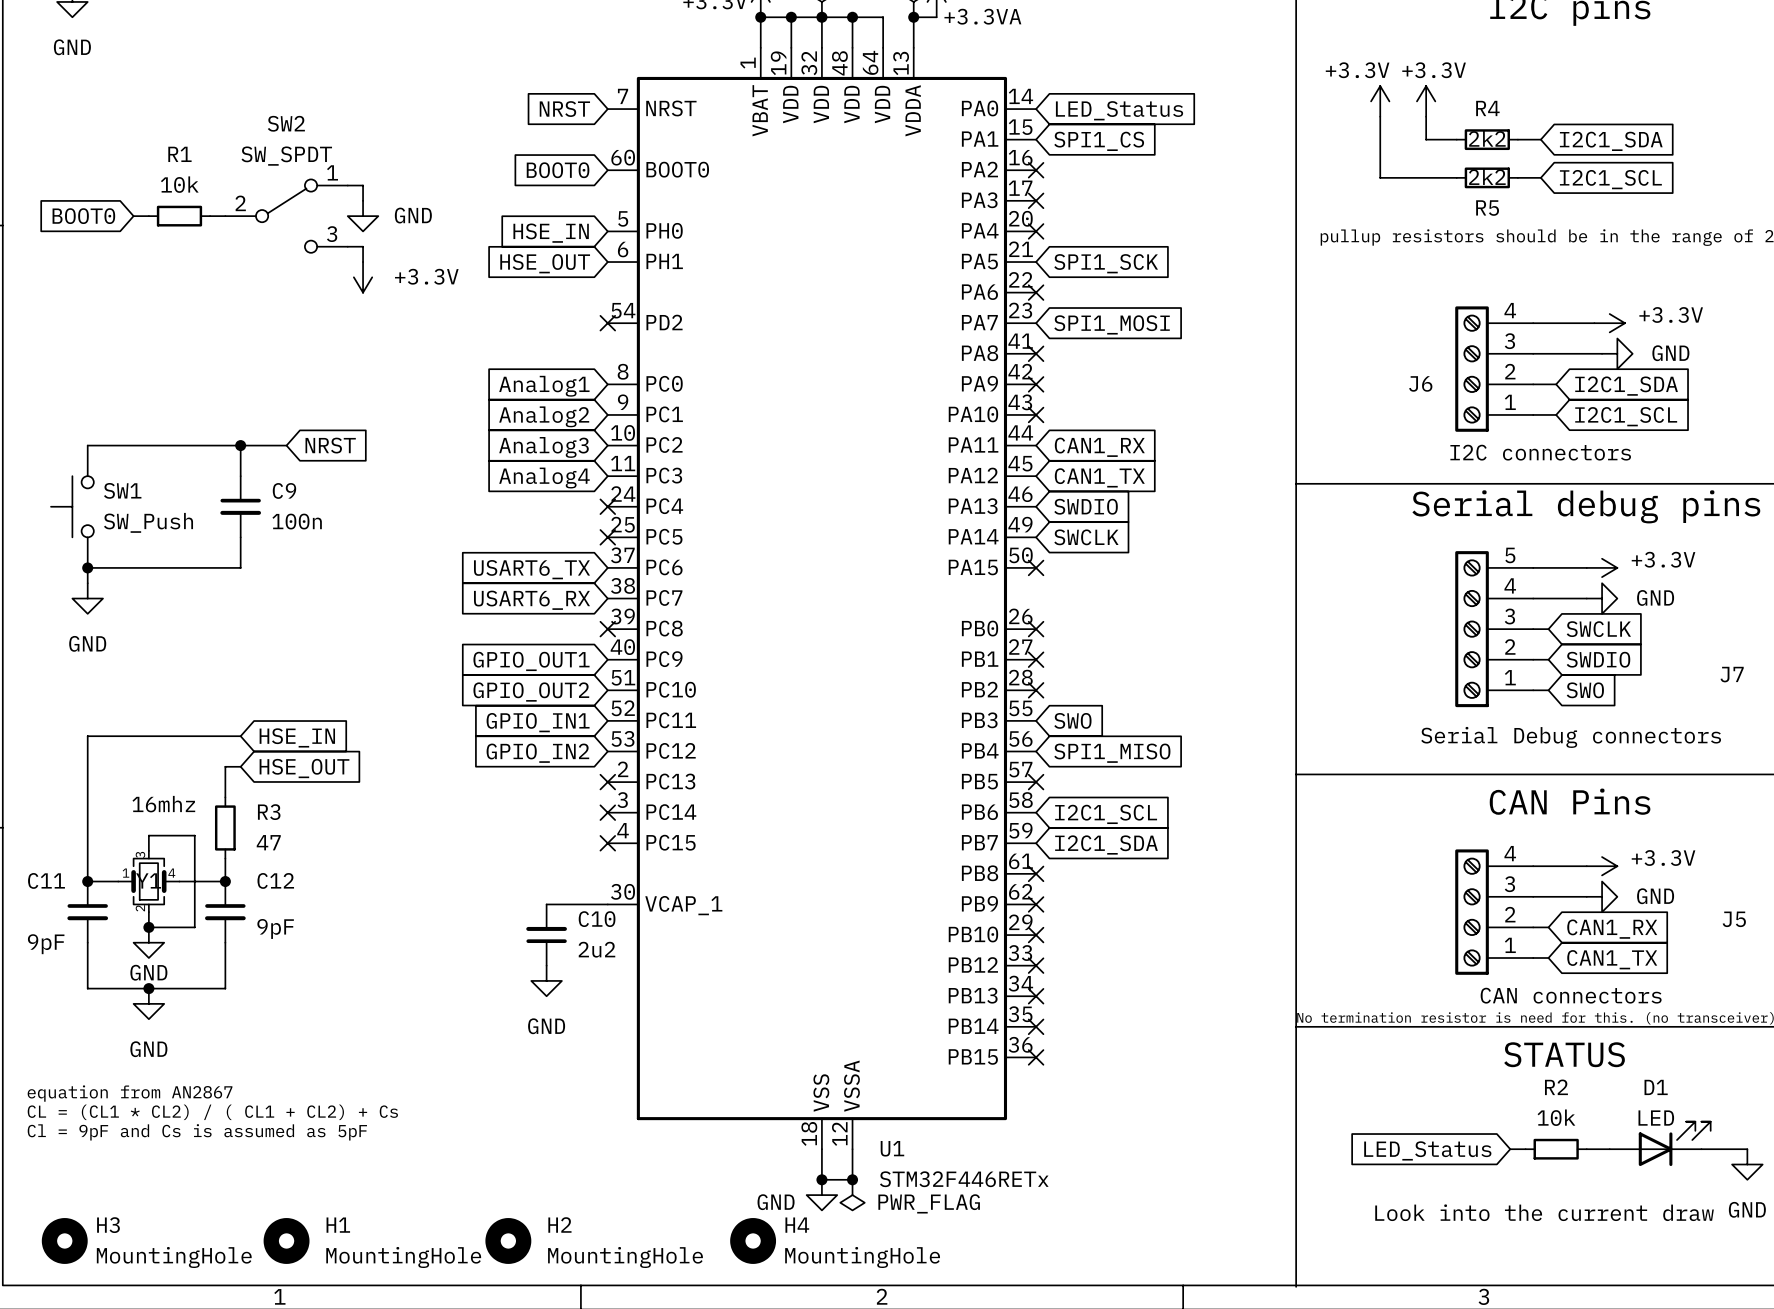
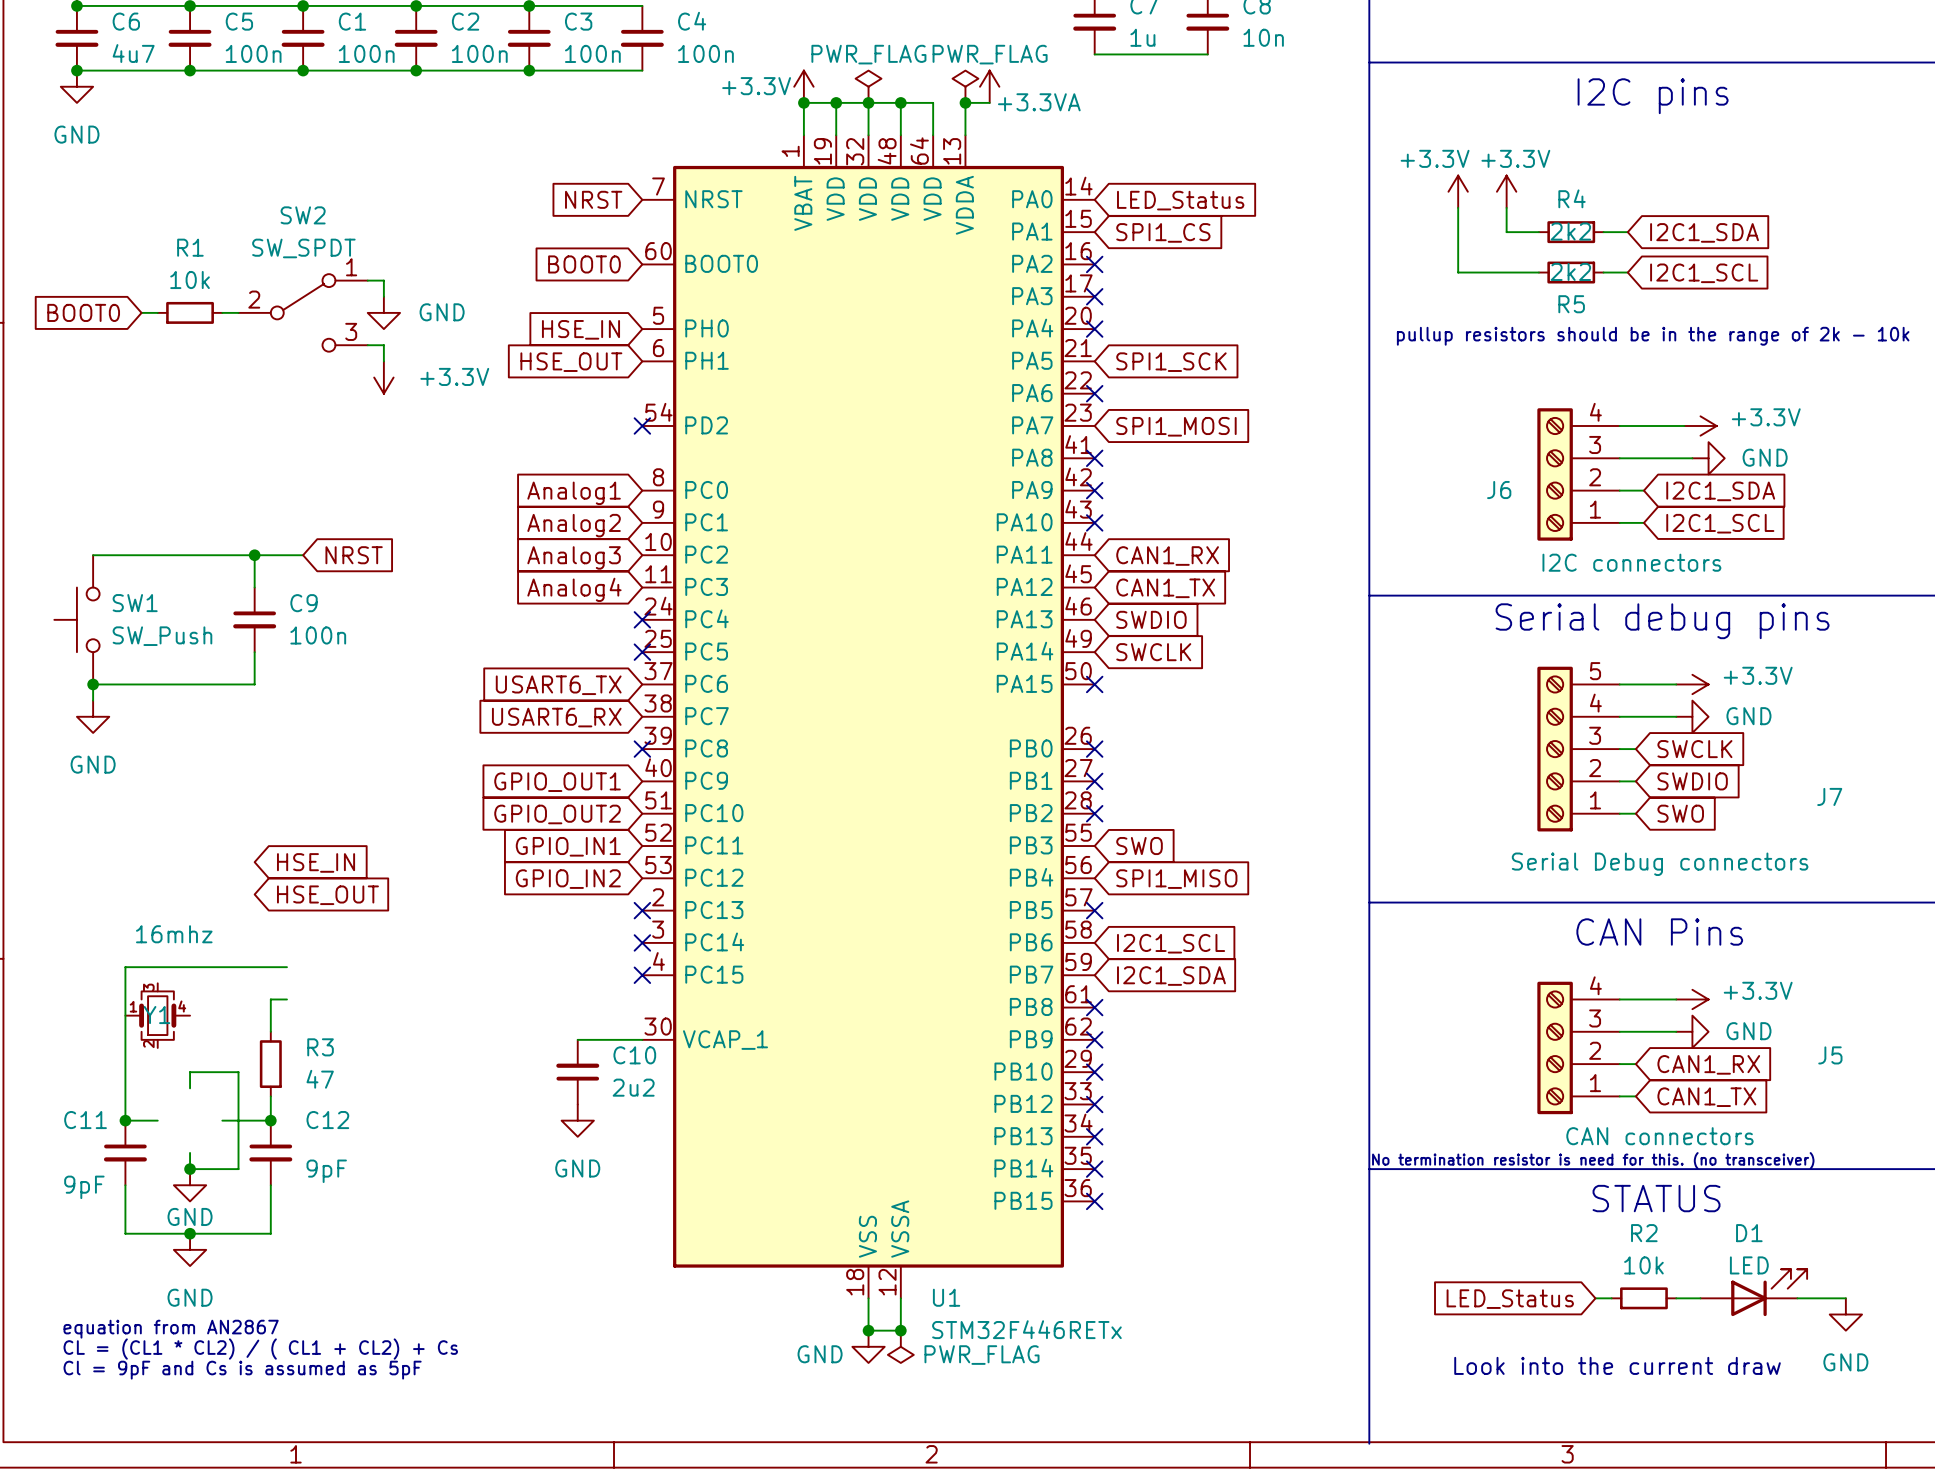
wire: (240, 736) (87, 736) (87, 881) (118, 881) -> none
wire: (240, 766) (225, 766) (225, 797) -> (286, 999) (270, 999) (270, 1031)
R3 position: (225, 827) -> (270, 1064)
wire: (148, 835) (148, 850) -> (157, 967) (125, 967) (125, 1120) (157, 1120)
wire: (194, 835) (194, 927) (148, 927) (148, 912) -> (206, 967) (286, 967)
wire: (225, 858) (225, 881) (179, 881) -> (270, 1096) (270, 1120) (222, 1120)
junction: (87, 881) -> none
junction: (225, 881) -> none
C11 position: (87, 912) -> (125, 1152)
C12 position: (225, 912) -> (270, 1152)
junction: (148, 927) -> none
wire: (87, 942) (87, 988) (225, 988) -> (190, 1152) (190, 1169) (238, 1169) (238, 1128)
power symbol: GND (148, 942) -> none
wire: none -> (238, 1080) (238, 1072) (190, 1072) (190, 1088)
junction: none -> (125, 1120)
junction: none -> (270, 1120)
junction: (148, 988) -> none
power symbol position: GND (148, 1003) -> GND (190, 1185)
junction: none -> (190, 1169)
wire: none -> (125, 1185) (125, 1233) (270, 1233) (270, 1185)
power symbol text position: GND (148, 1049) -> GND (190, 1216)
junction: none -> (190, 1233)
text position: equation from AN2867 (130, 1093) -> equation from AN2867 (171, 1329)
power symbol: none -> GND (190, 1249)
text position: CL = (CL1 * CL2) / ( CL1 + CL2) + Cs (212, 1112) -> CL = (CL1 * CL2) / ( CL1 + CL2) + Cs (260, 1349)
text position: Cl = 9pF and Cs is assumed as 5pF (197, 1132) -> Cl = 9pF and Cs is assumed as 5pF (242, 1370)
H3: MountingHole (64, 1240) -> none
H1: MountingHole (286, 1240) -> none
H2: MountingHole (508, 1240) -> none
H4: MountingHole (753, 1240) -> none

